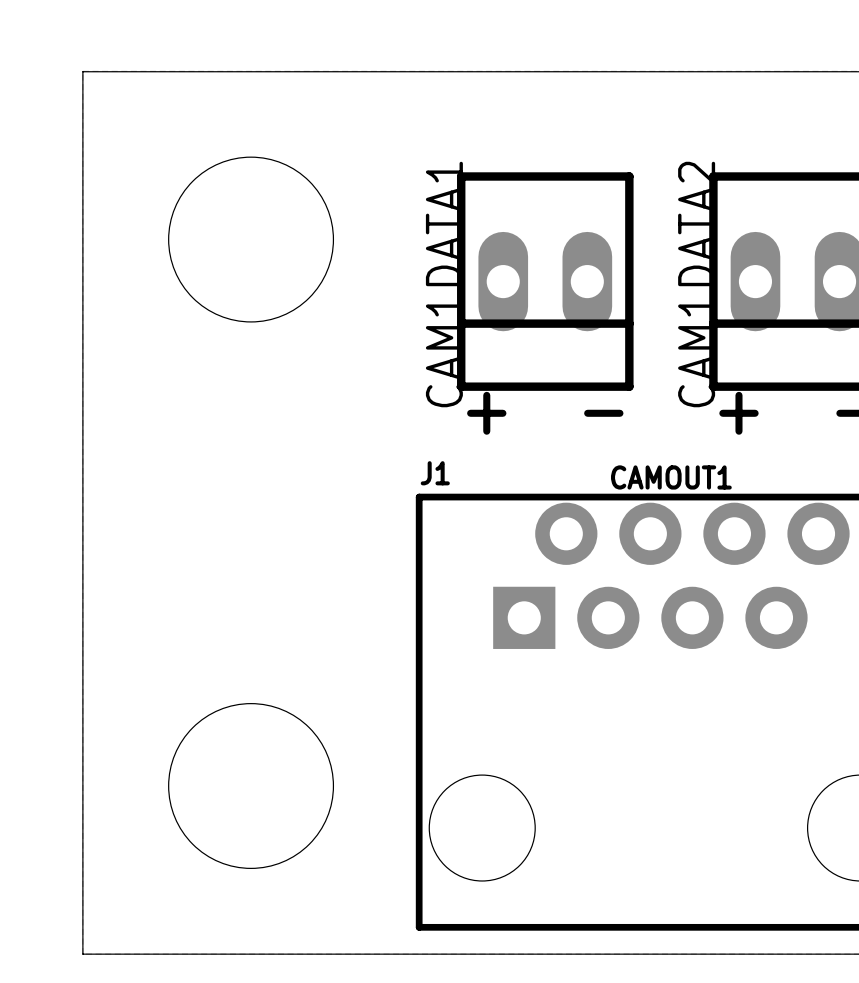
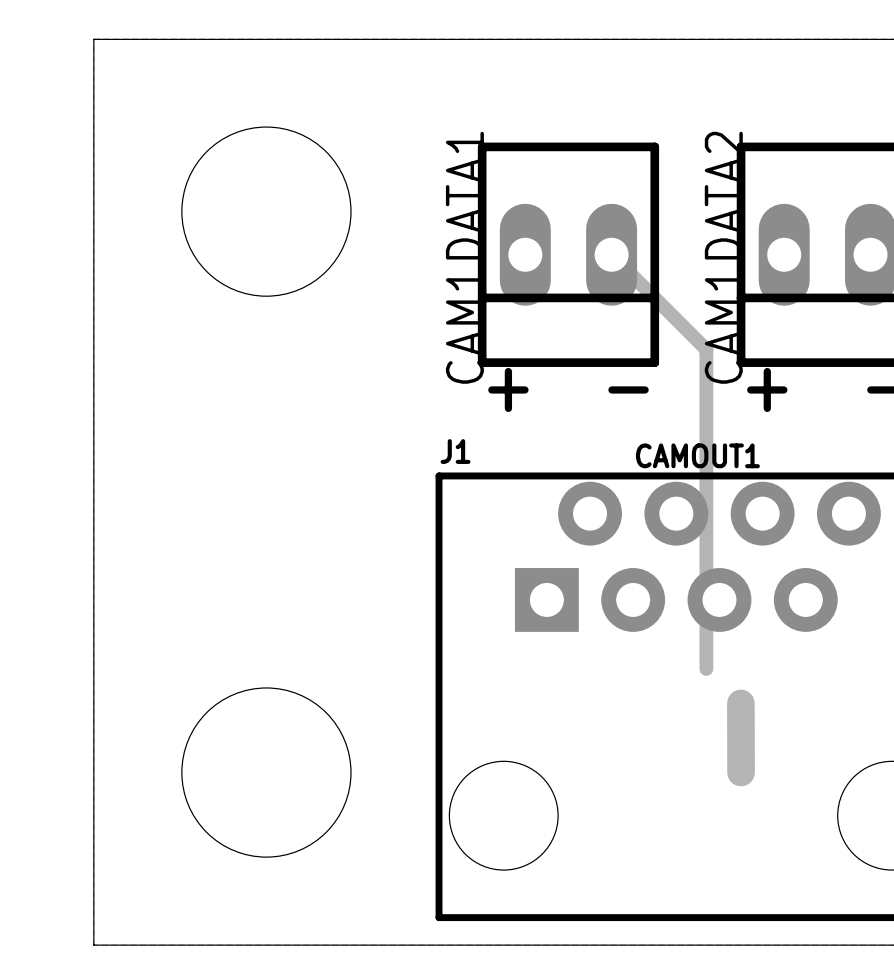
track: none -> (611, 254) (706, 349) (706, 668)
track: none -> (740, 703) (741, 772)

